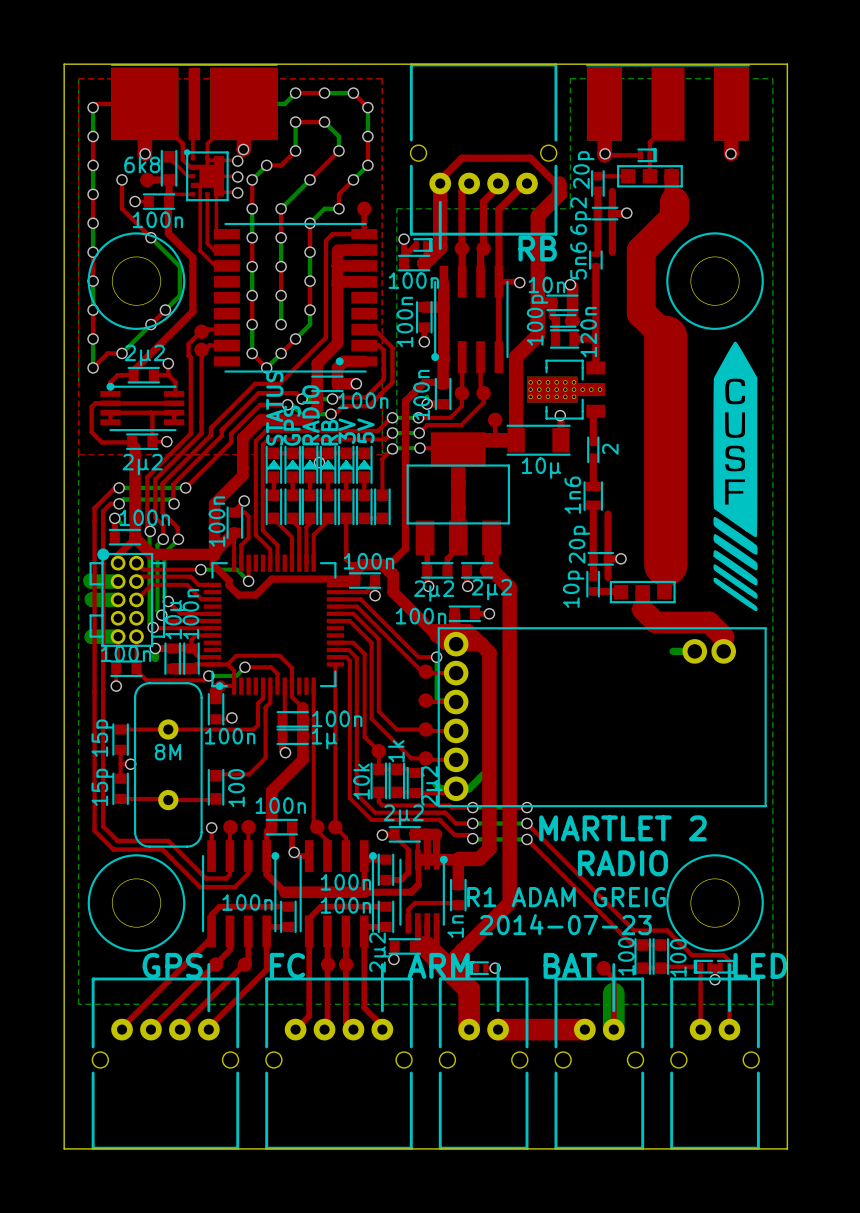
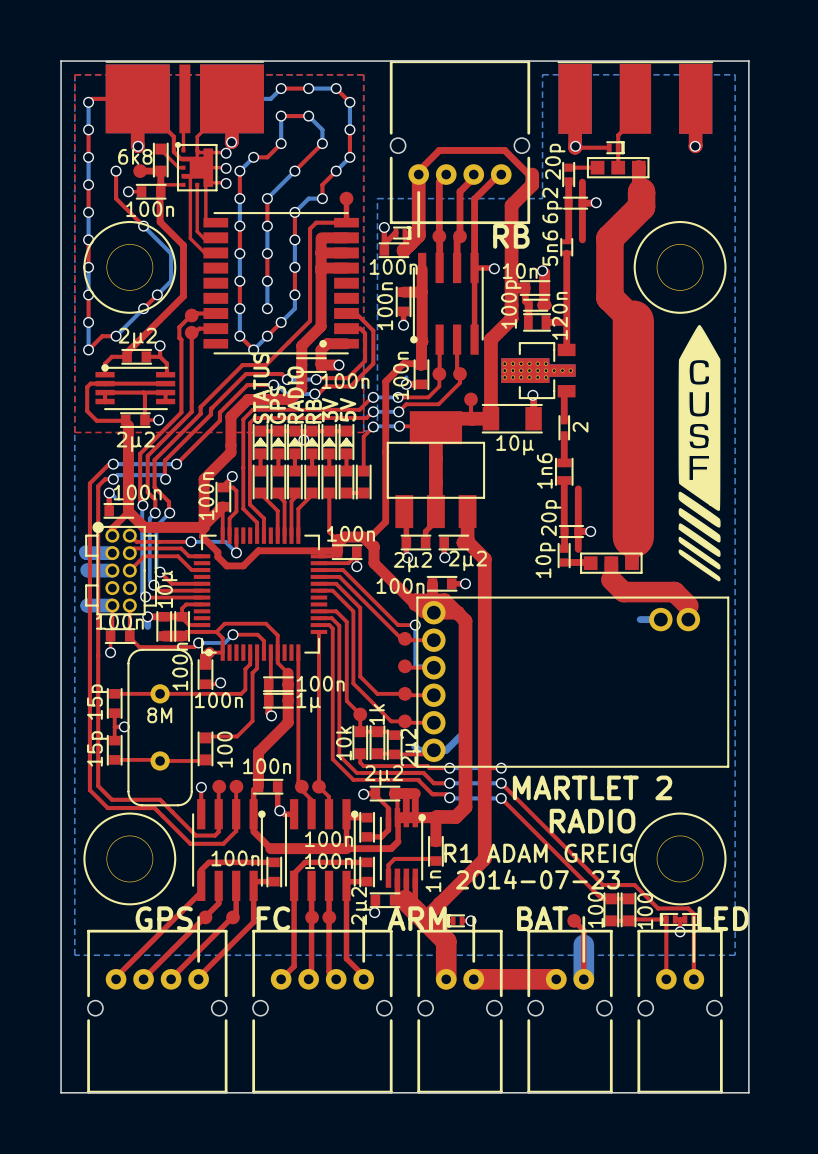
part value position: 100n (190, 614) -> 100n (180, 666)

